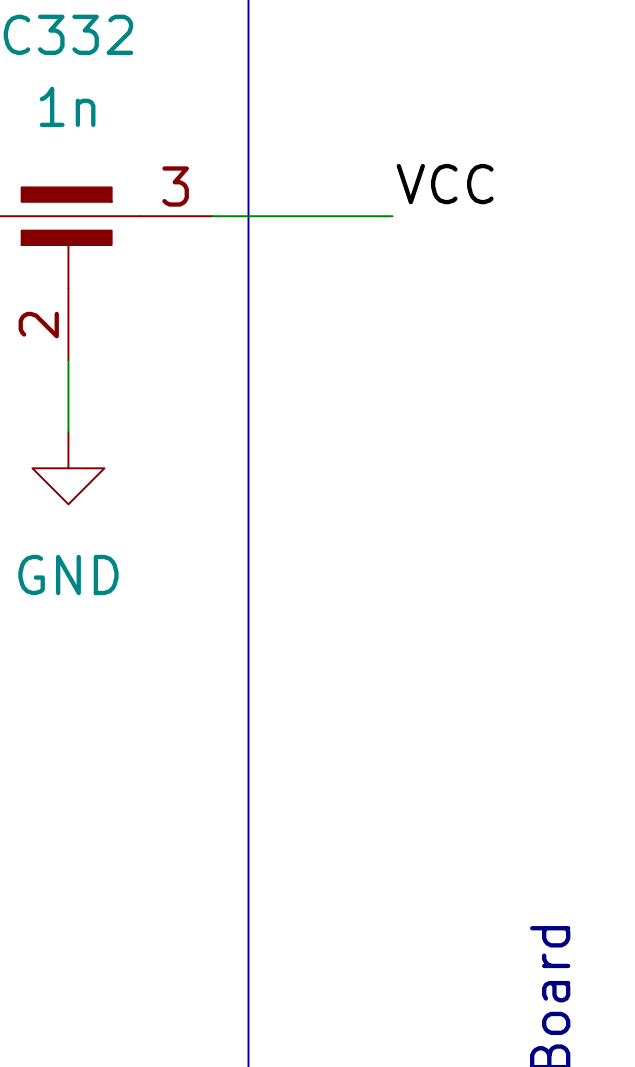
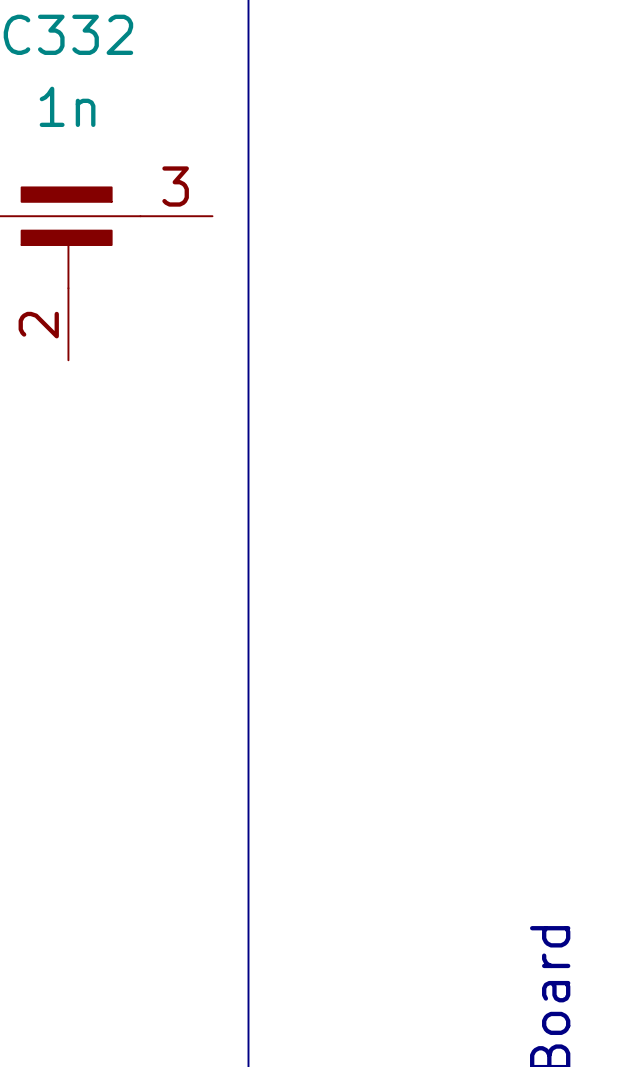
label: VCC (445, 184) -> none
wire: (212, 216) (392, 216) -> none
wire: (68, 360) (68, 432) -> none
power symbol: GND (68, 468) -> none

